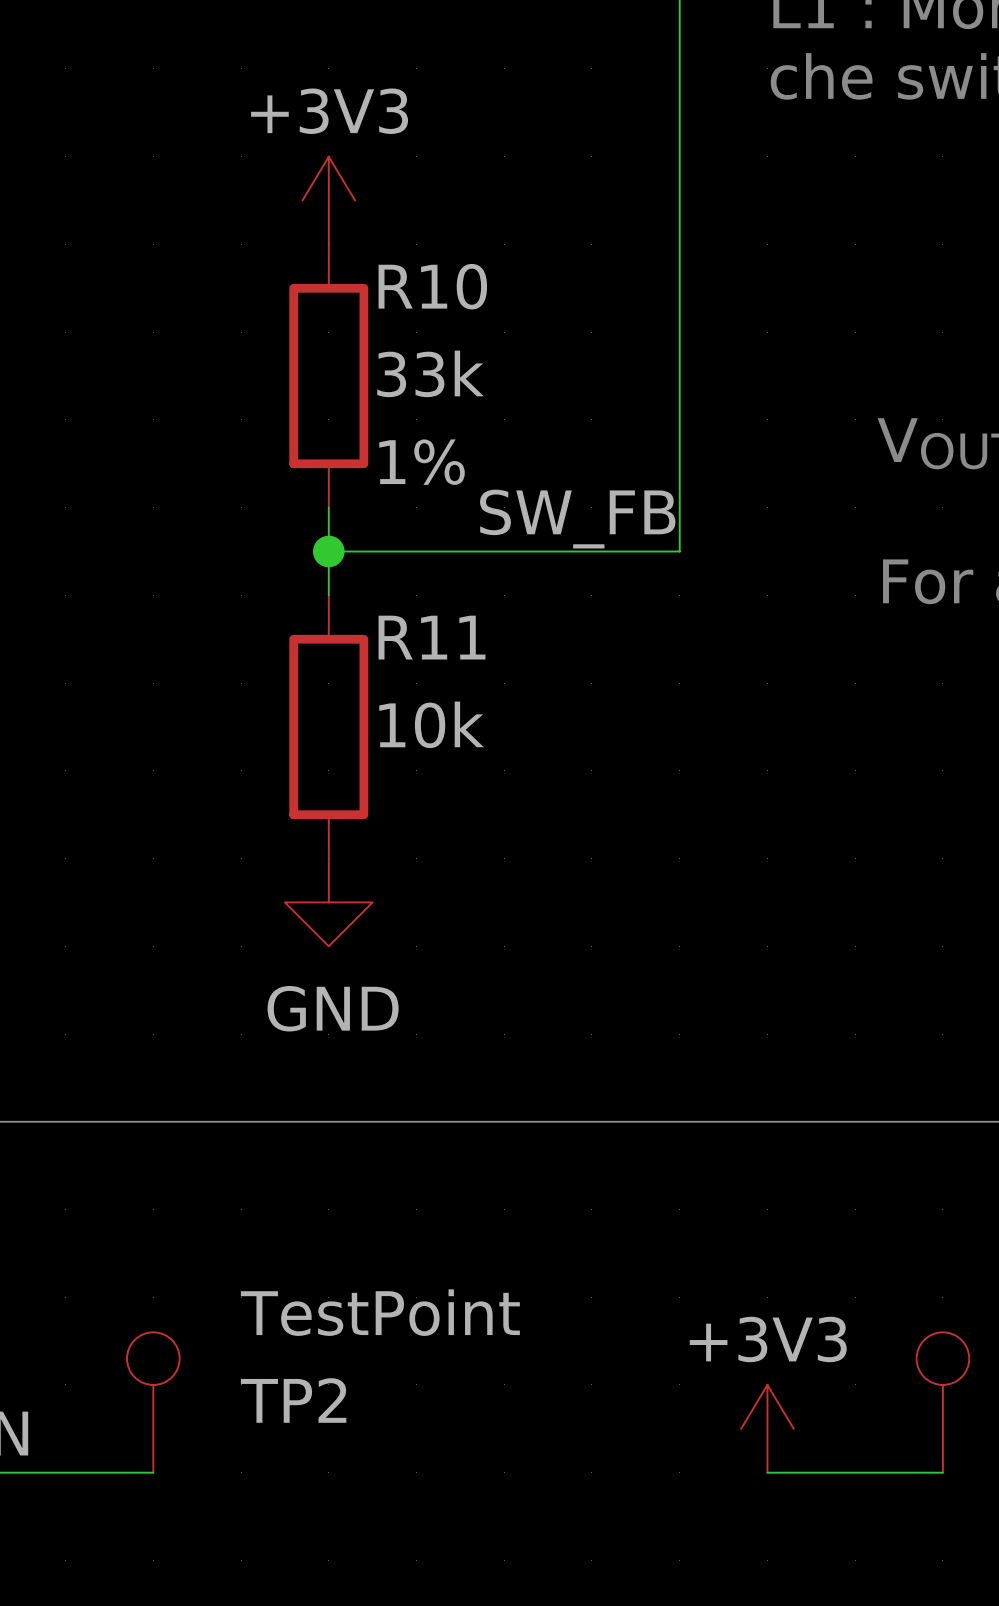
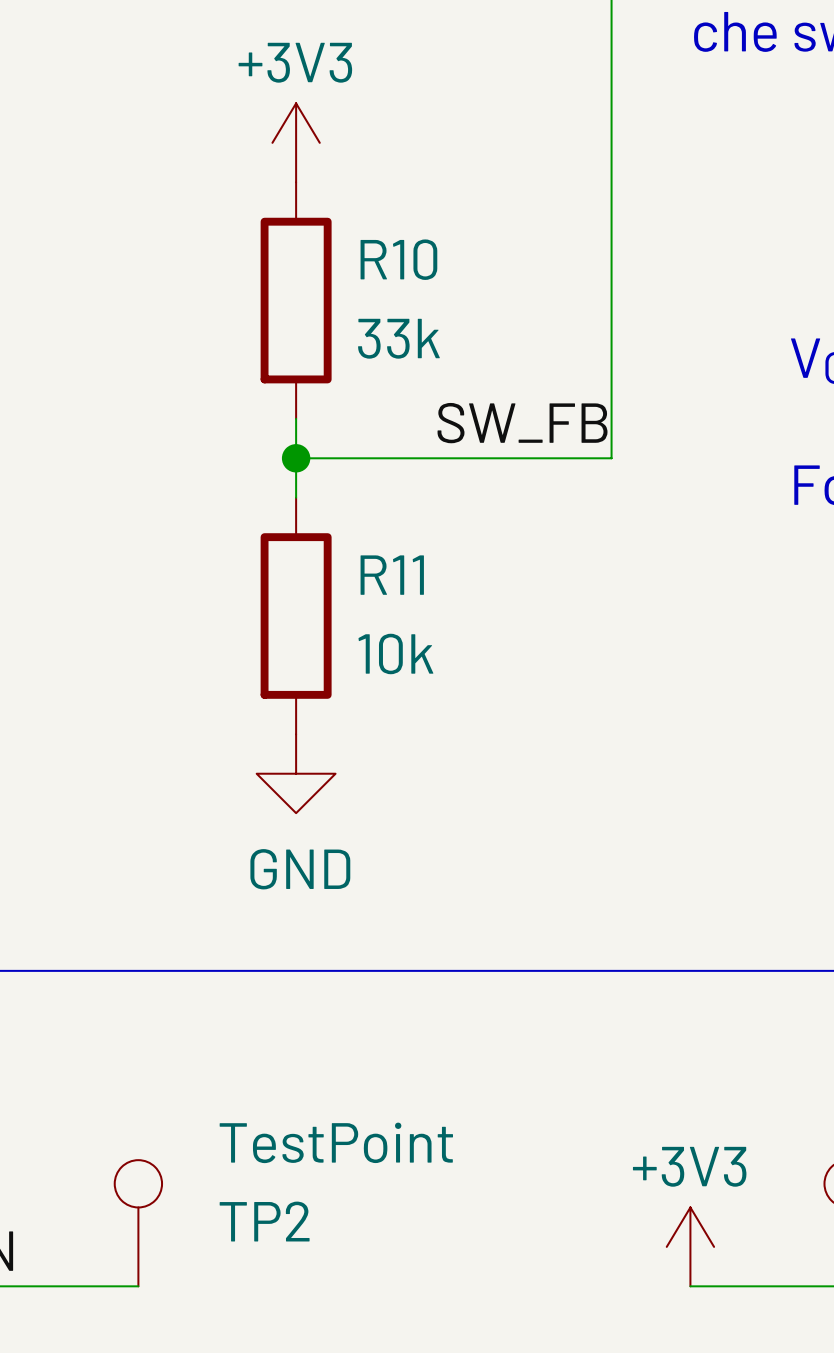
R10 name position: R10 (432, 286) -> R10 (398, 259)
R10 value position: 33k (430, 373) -> 33k (398, 338)
R10 text: 1% (422, 462) -> none
R11 name position: R11 (432, 637) -> R11 (392, 575)
R11 value position: 10k (431, 724) -> 10k (395, 653)

